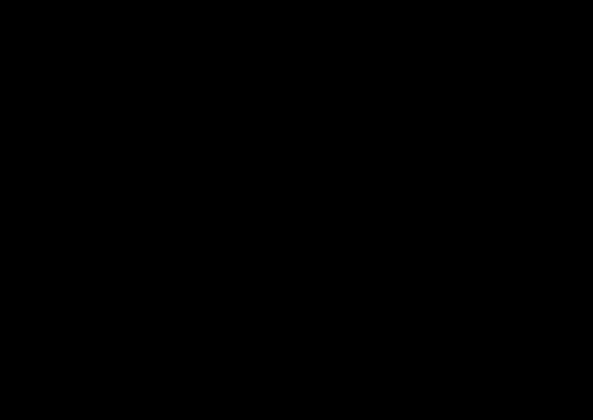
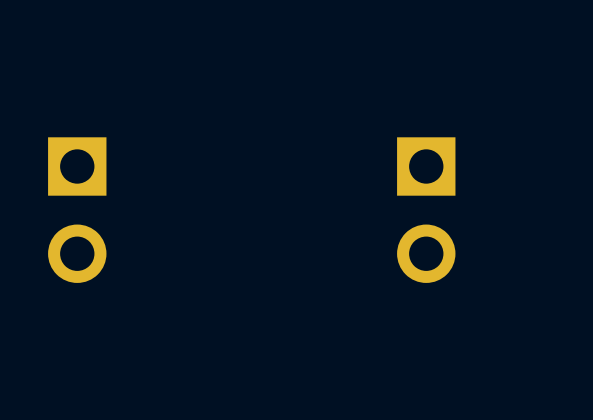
part: none -> (77, 210)
part: none -> (426, 210)

